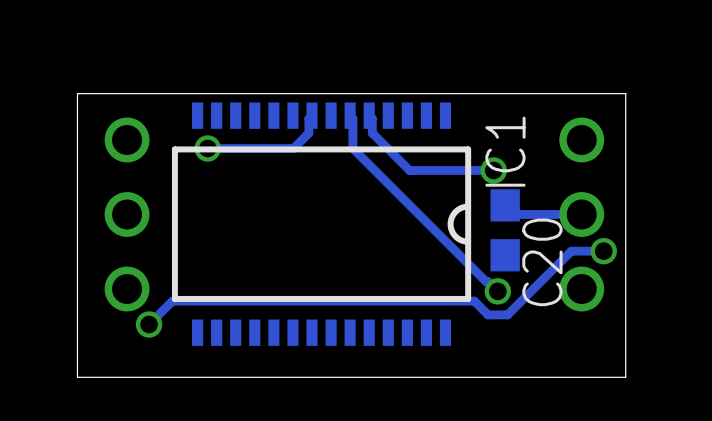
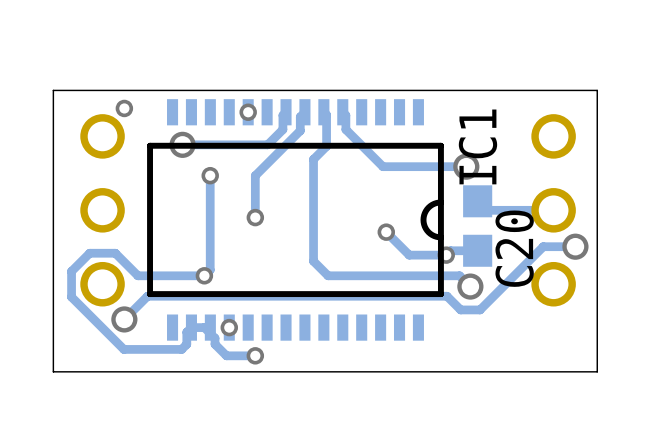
via: none -> (124, 108)
via: none -> (248, 112)
track: none -> (304, 112) (300, 116) (300, 130) (255, 175) (255, 217)
track: (352, 148) (488, 281) -> (326, 144) (313, 159) (313, 261) (328, 275) (460, 277)
track: none -> (210, 175) (210, 269) (204, 275) (137, 275) (115, 253) (89, 253) (71, 271) (71, 297) (123, 349) (181, 349) (186, 344) (186, 332) (191, 327) (210, 327)
via: none -> (210, 175)
via: none -> (255, 217)
track: none -> (386, 232) (409, 255) (446, 255) (450, 250) (477, 250)
via: none -> (386, 232)
via: none -> (446, 255)
via: none -> (204, 275)
track: none -> (204, 327) (215, 338) (215, 344) (226, 355) (255, 355)
via: none -> (229, 327)
via: none -> (255, 355)

